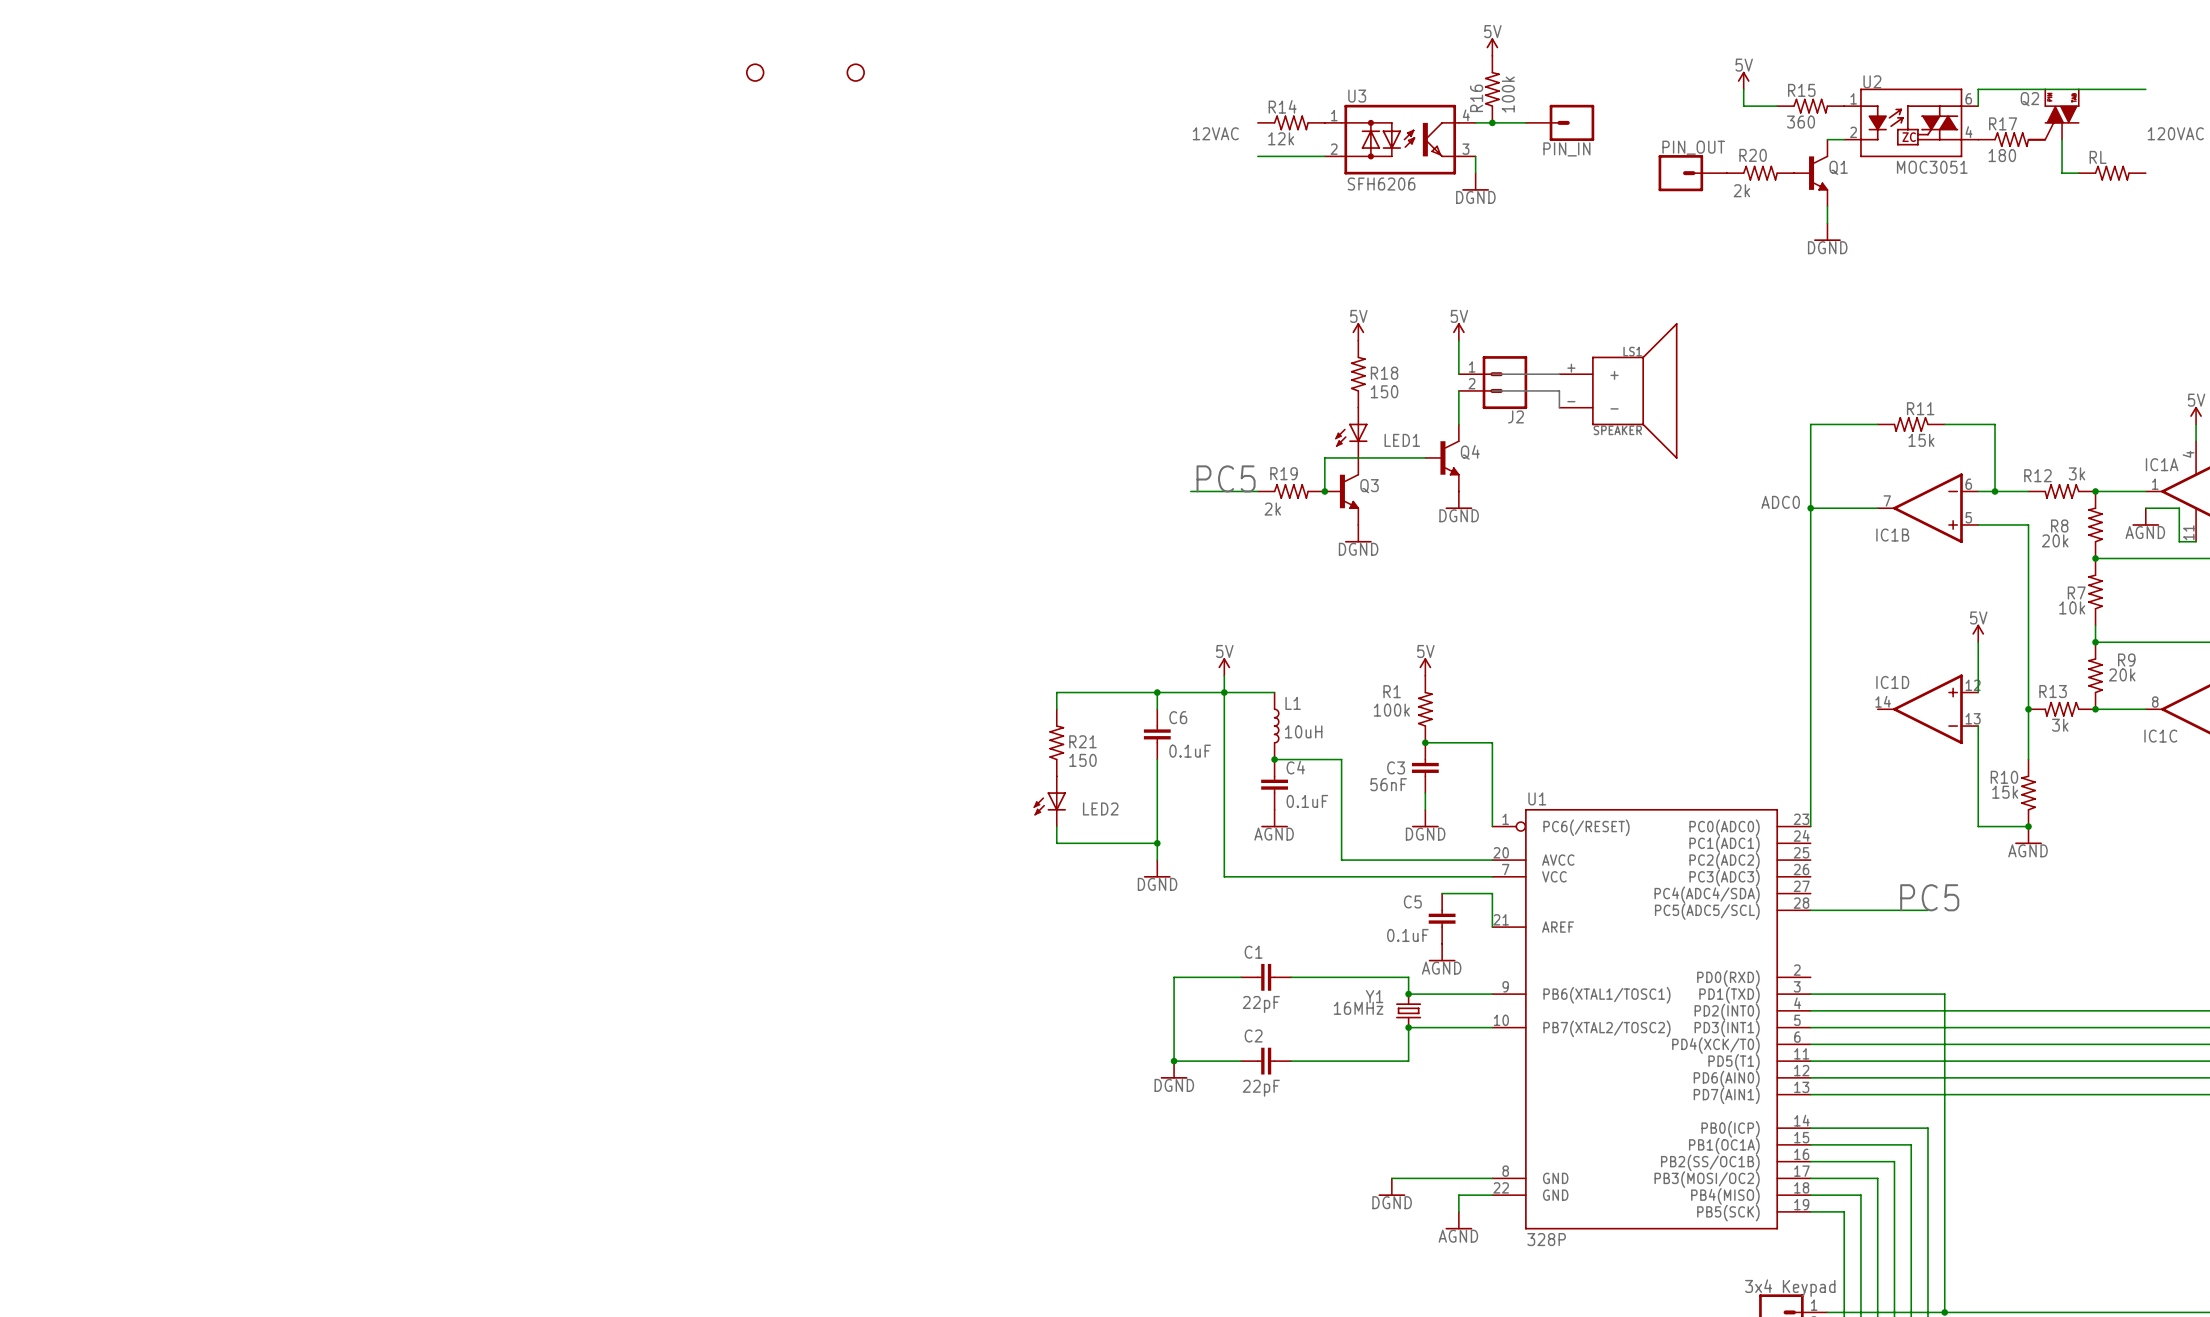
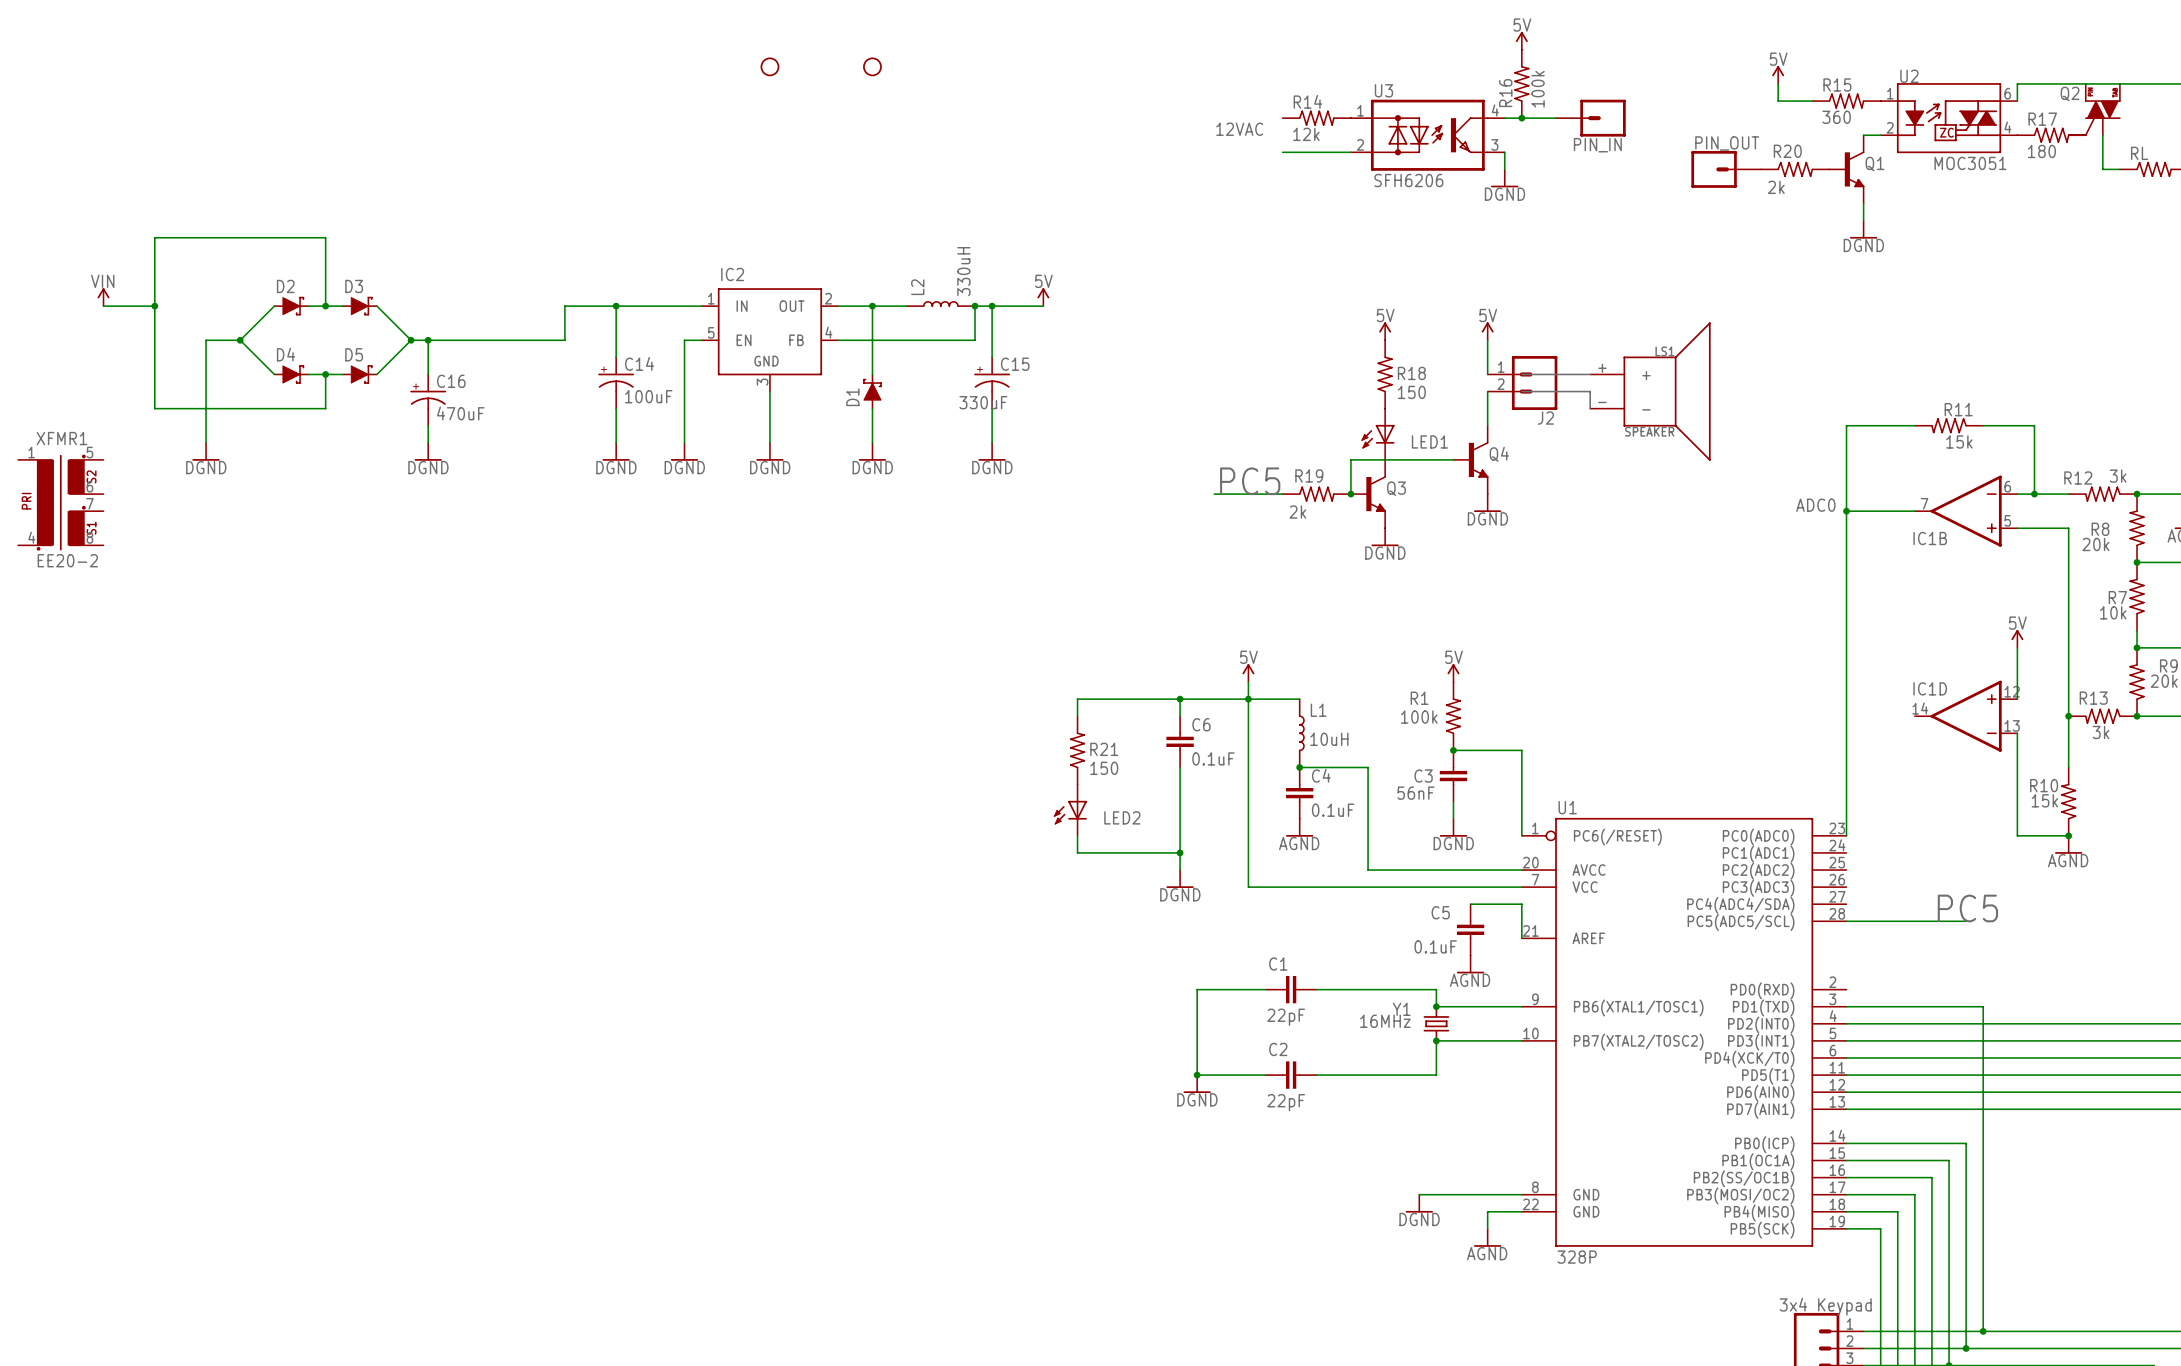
power symbol: none -> VIN (103, 297)
power symbol: none -> 5V (1043, 297)
L2: none -> 330uH (940, 303)
wire: none -> (103, 306) (154, 306)
junction: none -> (154, 306)
wire: none -> (274, 306) (240, 340)
D2: none -> (291, 306)
wire: none -> (308, 306) (342, 306)
wire: none -> (325, 306) (325, 237) (154, 237) (154, 408) (325, 408) (325, 374)
junction: none -> (325, 306)
D3: none -> (359, 306)
wire: none -> (376, 306) (411, 340)
wire: none -> (616, 306) (616, 357)
junction: none -> (616, 306)
wire: none -> (701, 306) (564, 306) (564, 340) (411, 340)
wire: none -> (838, 306) (906, 306)
wire: none -> (872, 306) (872, 374)
junction: none -> (872, 306)
junction: none -> (975, 306)
wire: none -> (992, 306) (992, 357)
junction: none -> (992, 306)
wire: none -> (1043, 306) (975, 306) (975, 340) (838, 340)
wire: none -> (240, 340) (206, 340) (206, 442)
wire: none -> (240, 340) (274, 374)
junction: none -> (240, 340)
wire: none -> (411, 340) (376, 374)
junction: none -> (411, 340)
wire: none -> (428, 340) (428, 374)
junction: none -> (428, 340)
wire: none -> (701, 340) (684, 340) (684, 442)
IC2: none -> (769, 339)
D4: none -> (291, 374)
wire: none -> (308, 374) (342, 374)
junction: none -> (325, 374)
D5: none -> (359, 374)
C14: none -> 100uF (616, 383)
C15: none -> (992, 383)
wire: none -> (769, 391) (769, 442)
D1: none -> (872, 391)
C16: none -> 470uF (428, 400)
text: none -> 330uF (983, 402)
wire: none -> (616, 408) (616, 442)
wire: none -> (872, 408) (872, 442)
wire: none -> (992, 408) (992, 442)
wire: none -> (428, 425) (428, 442)
power symbol: none -> DGND (206, 451)
power symbol: none -> DGND (428, 451)
power symbol: none -> DGND (616, 451)
power symbol: none -> DGND (684, 451)
power symbol: none -> DGND (769, 451)
power symbol: none -> DGND (872, 451)
power symbol: none -> DGND (992, 451)
XFMR1: none -> EE20-2 (60, 502)

